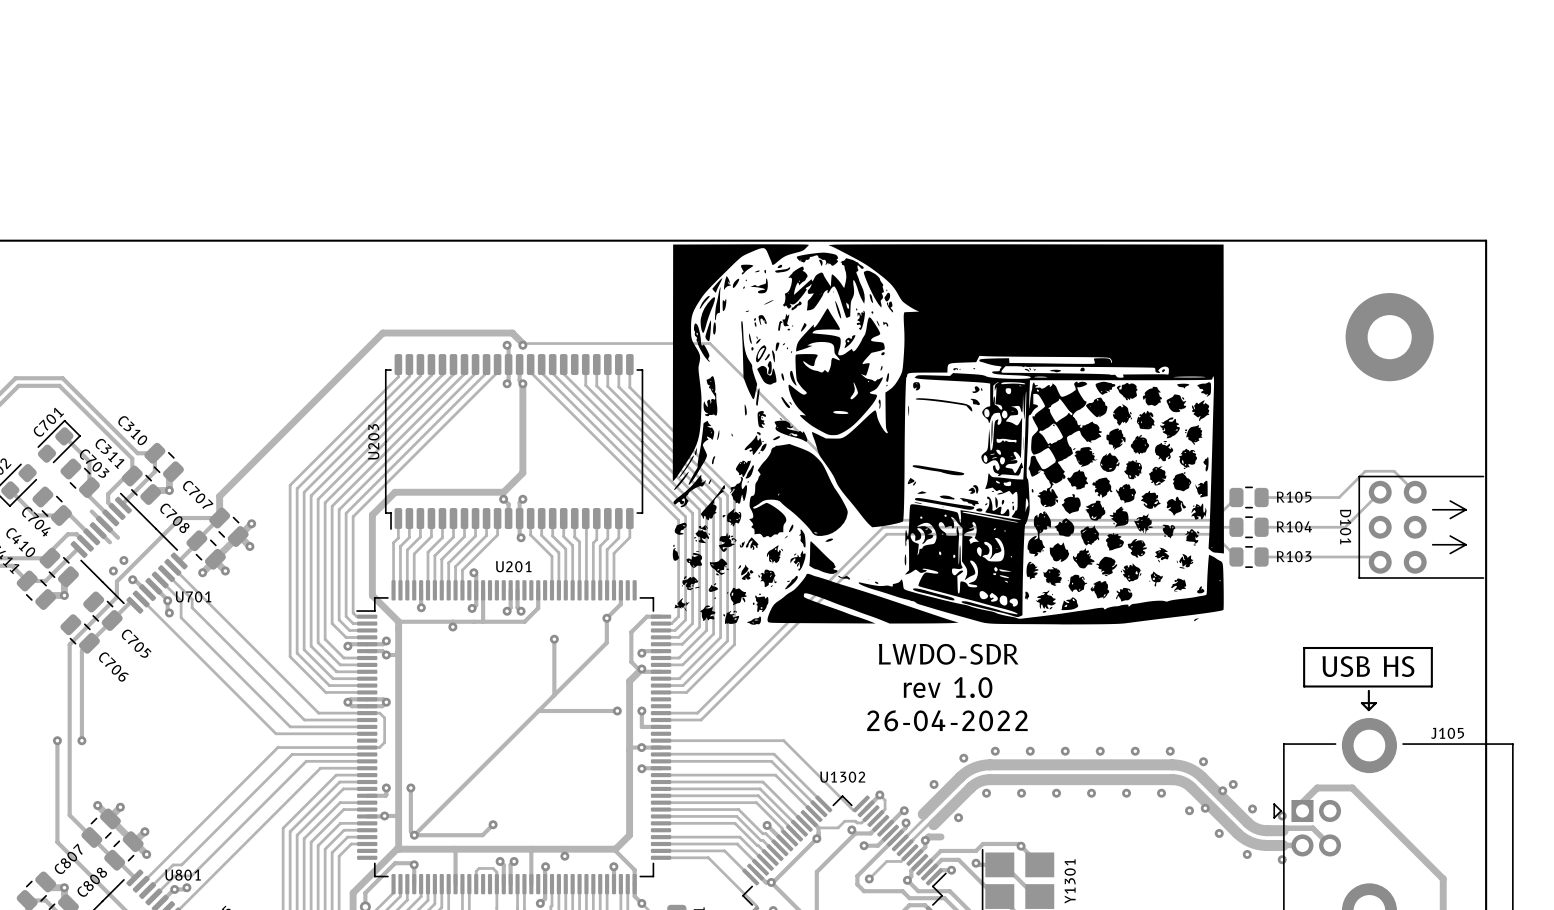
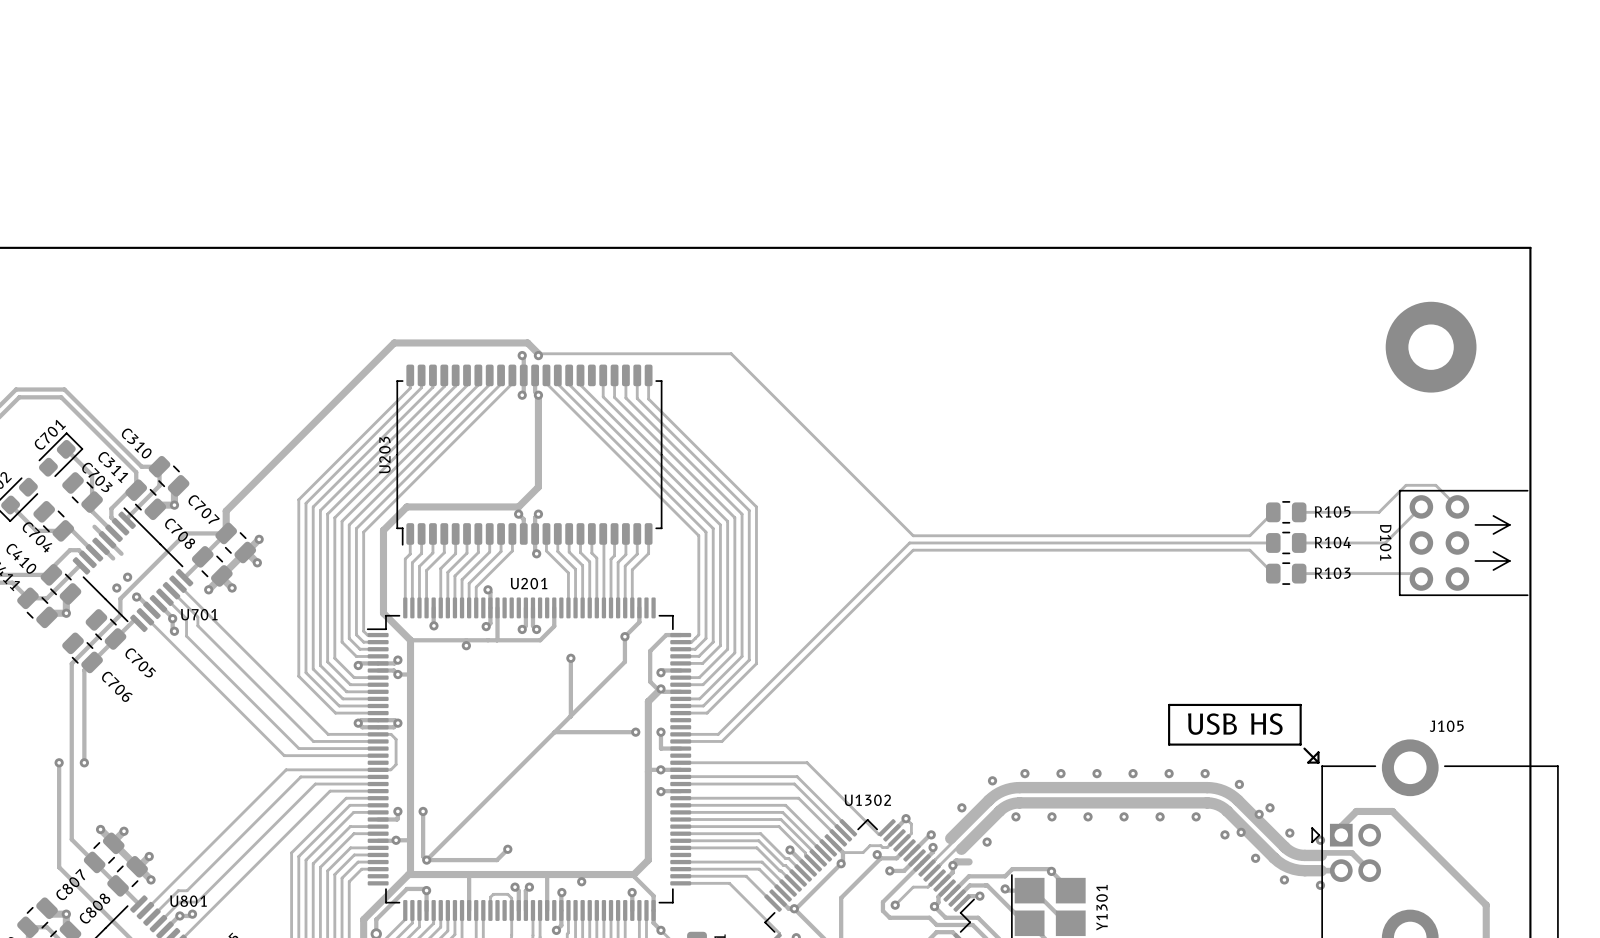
drawing: [672, 244, 1224, 625] -> none
line: (1304, 647) (1431, 647) (1431, 686) (1304, 686) (1304, 647) -> (1169, 704) (1300, 704) (1300, 744) (1169, 744) (1169, 704)
text: LWDO-SDR (948, 654) -> none
text position: USB HS (1368, 666) -> USB HS (1235, 724)
text: rev 1.0 (948, 687) -> none
line: (1368, 690) (1368, 710) -> none
line: (1368, 710) (1375, 703) (1361, 703) (1368, 710) -> none
text: 26-04-2022 (947, 720) -> none
line: none -> (1304, 748) (1318, 762)
J105 name position: J105 (1447, 733) -> J105 (1446, 726)
line: none -> (1318, 762) (1318, 752) (1308, 762) (1318, 762)

